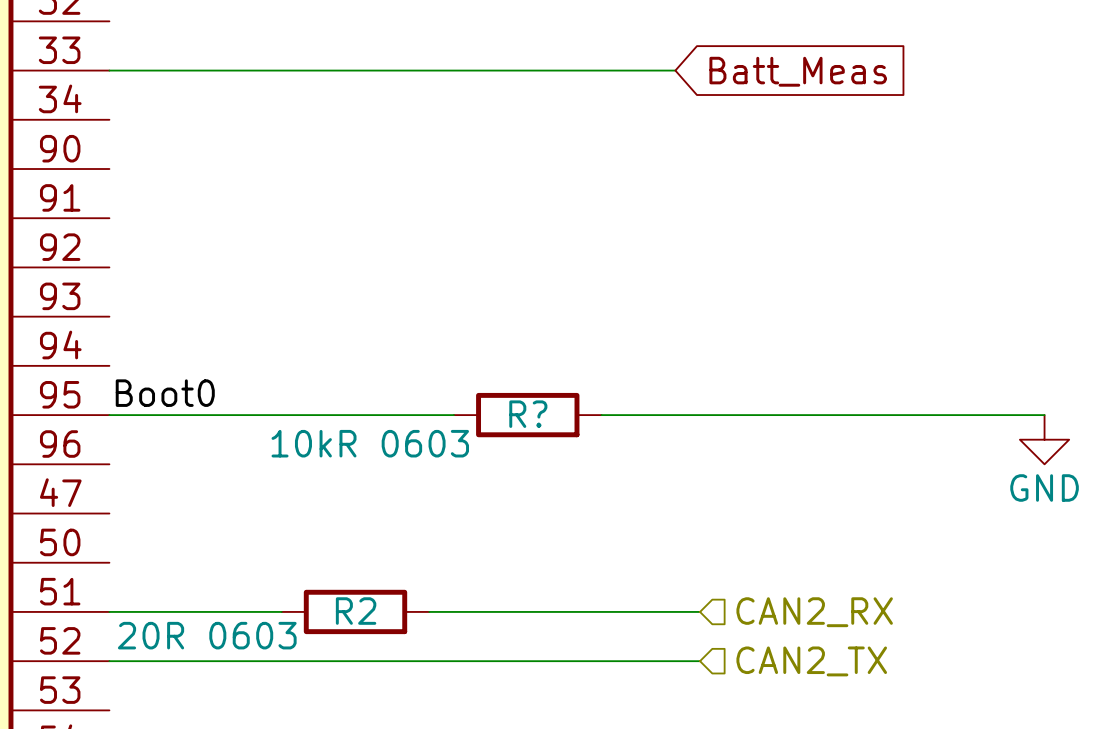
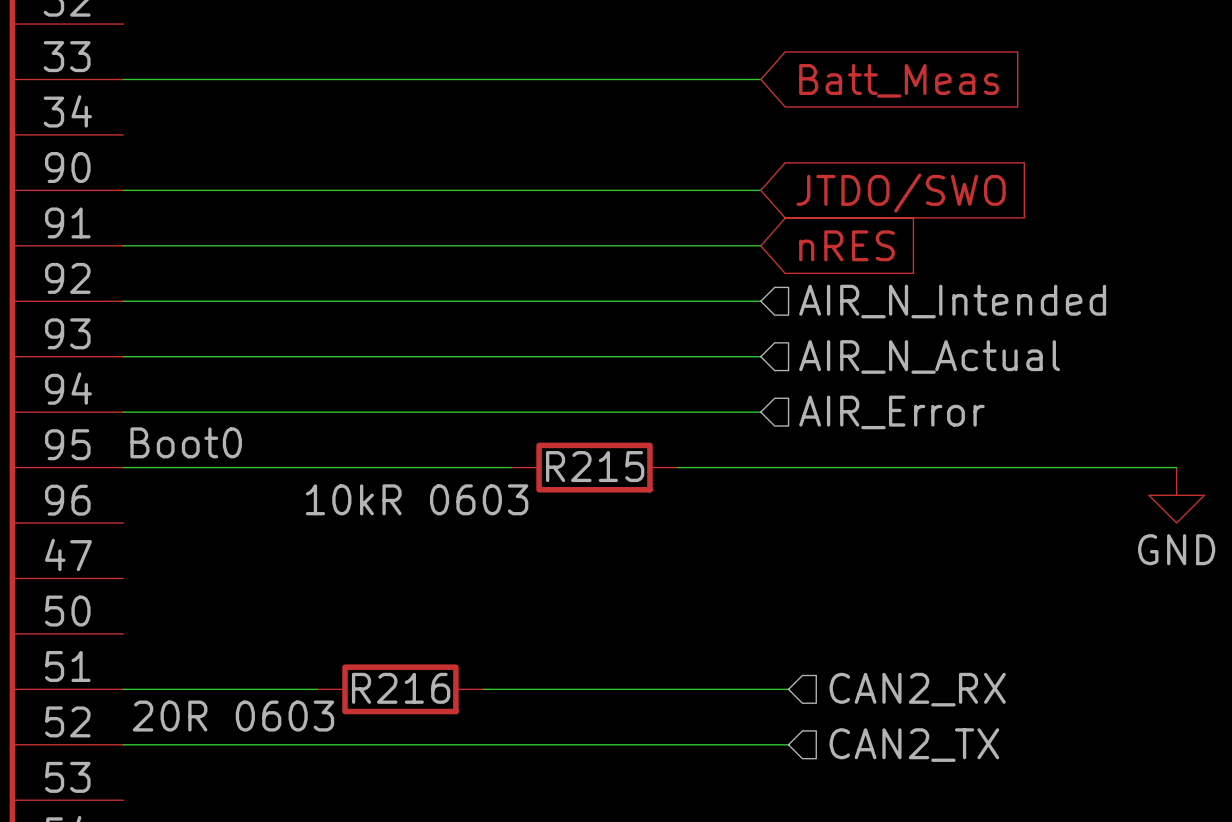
wire: none -> (123, 190) (760, 190)
global label: none -> JTDO/SWO (901, 193)
wire: none -> (123, 245) (760, 245)
global label: none -> nRES (847, 245)
wire: none -> (123, 301) (760, 301)
hierarchical label: none -> AIR_N_Intended (952, 301)
wire: none -> (123, 356) (760, 356)
hierarchical label: none -> AIR_N_Actual (929, 356)
wire: none -> (123, 412) (760, 412)
hierarchical label: none -> AIR_Error (891, 412)
R? name: R? (528, 414) -> R215 (595, 466)
R2 name: R2 (356, 611) -> R216 (401, 688)

